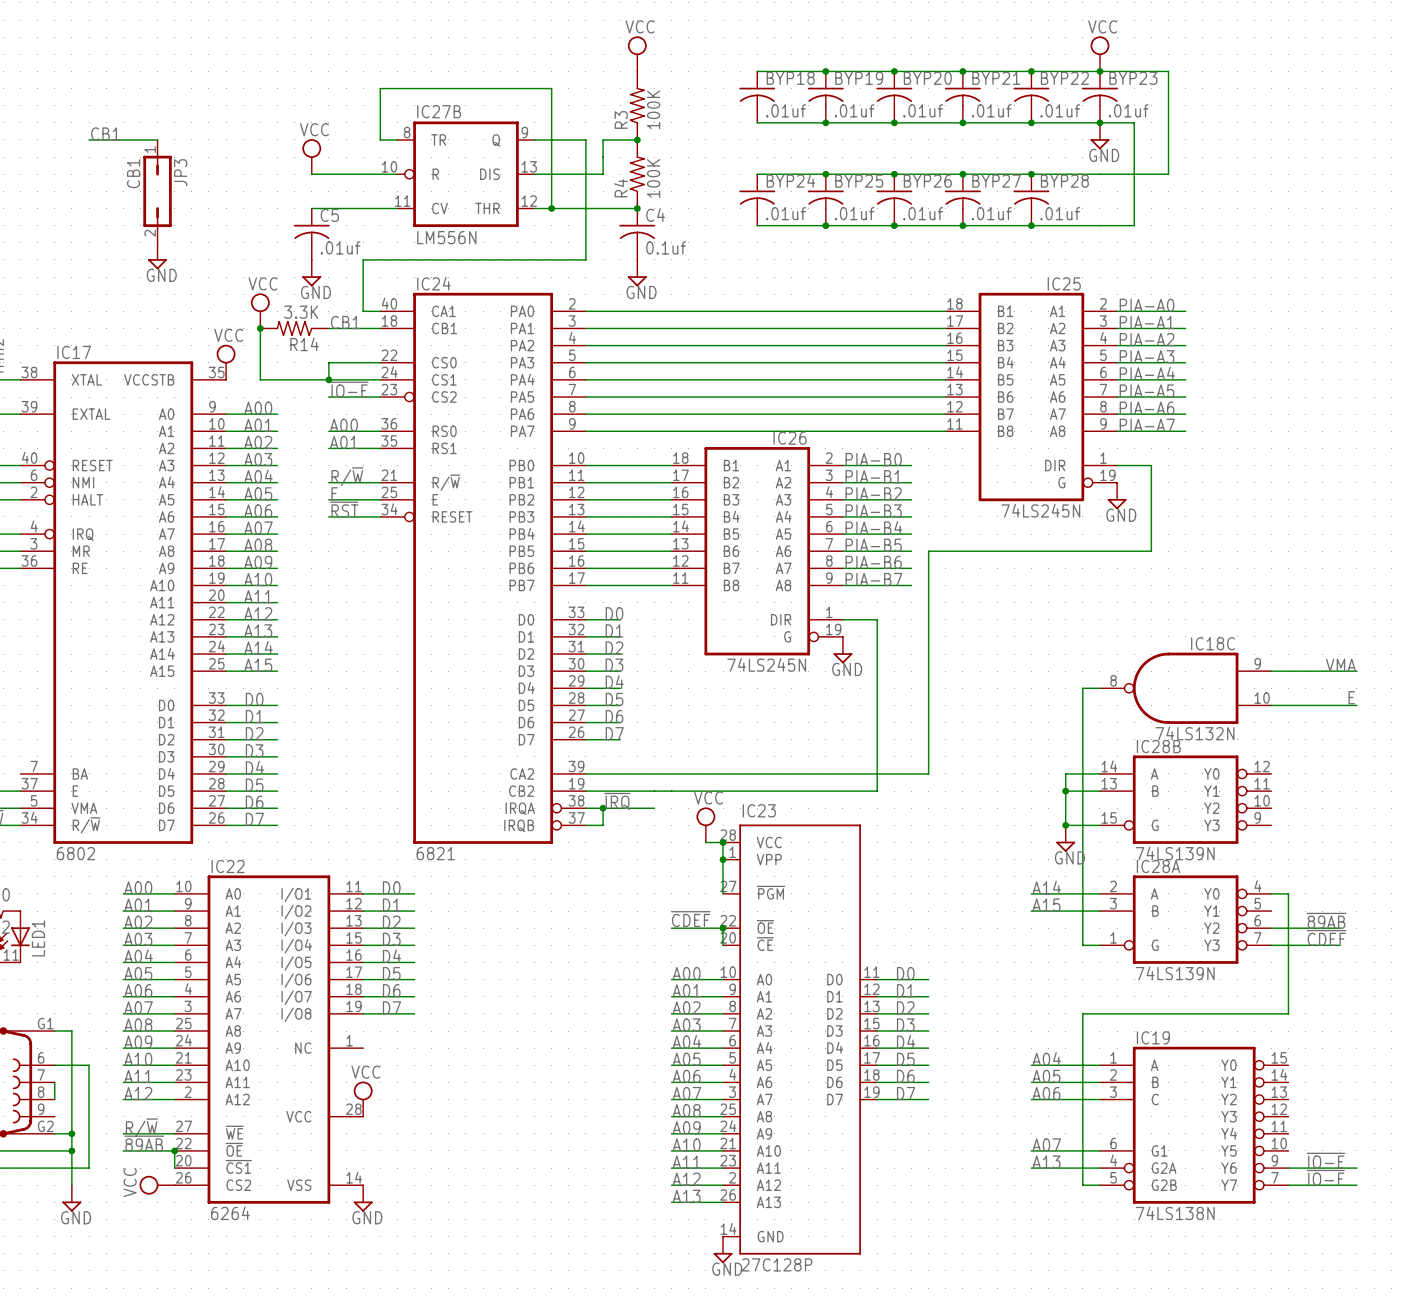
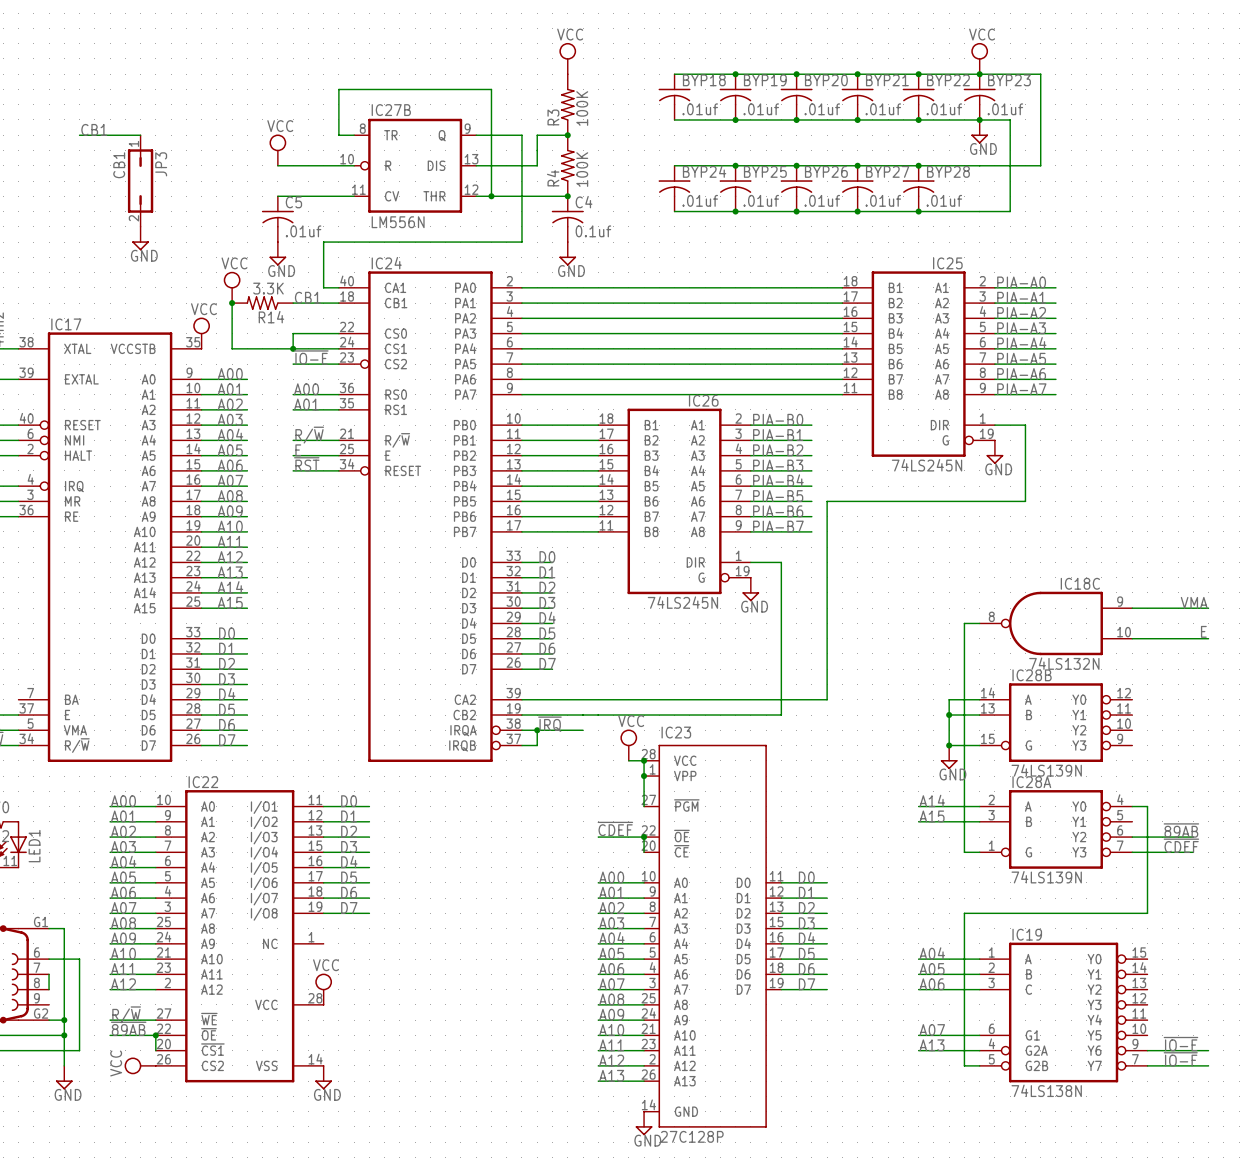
IC17 value: 6802 (75, 853) -> none
IC24 value: 6821 (435, 853) -> none
IC22 value: 6264 (230, 1213) -> none

